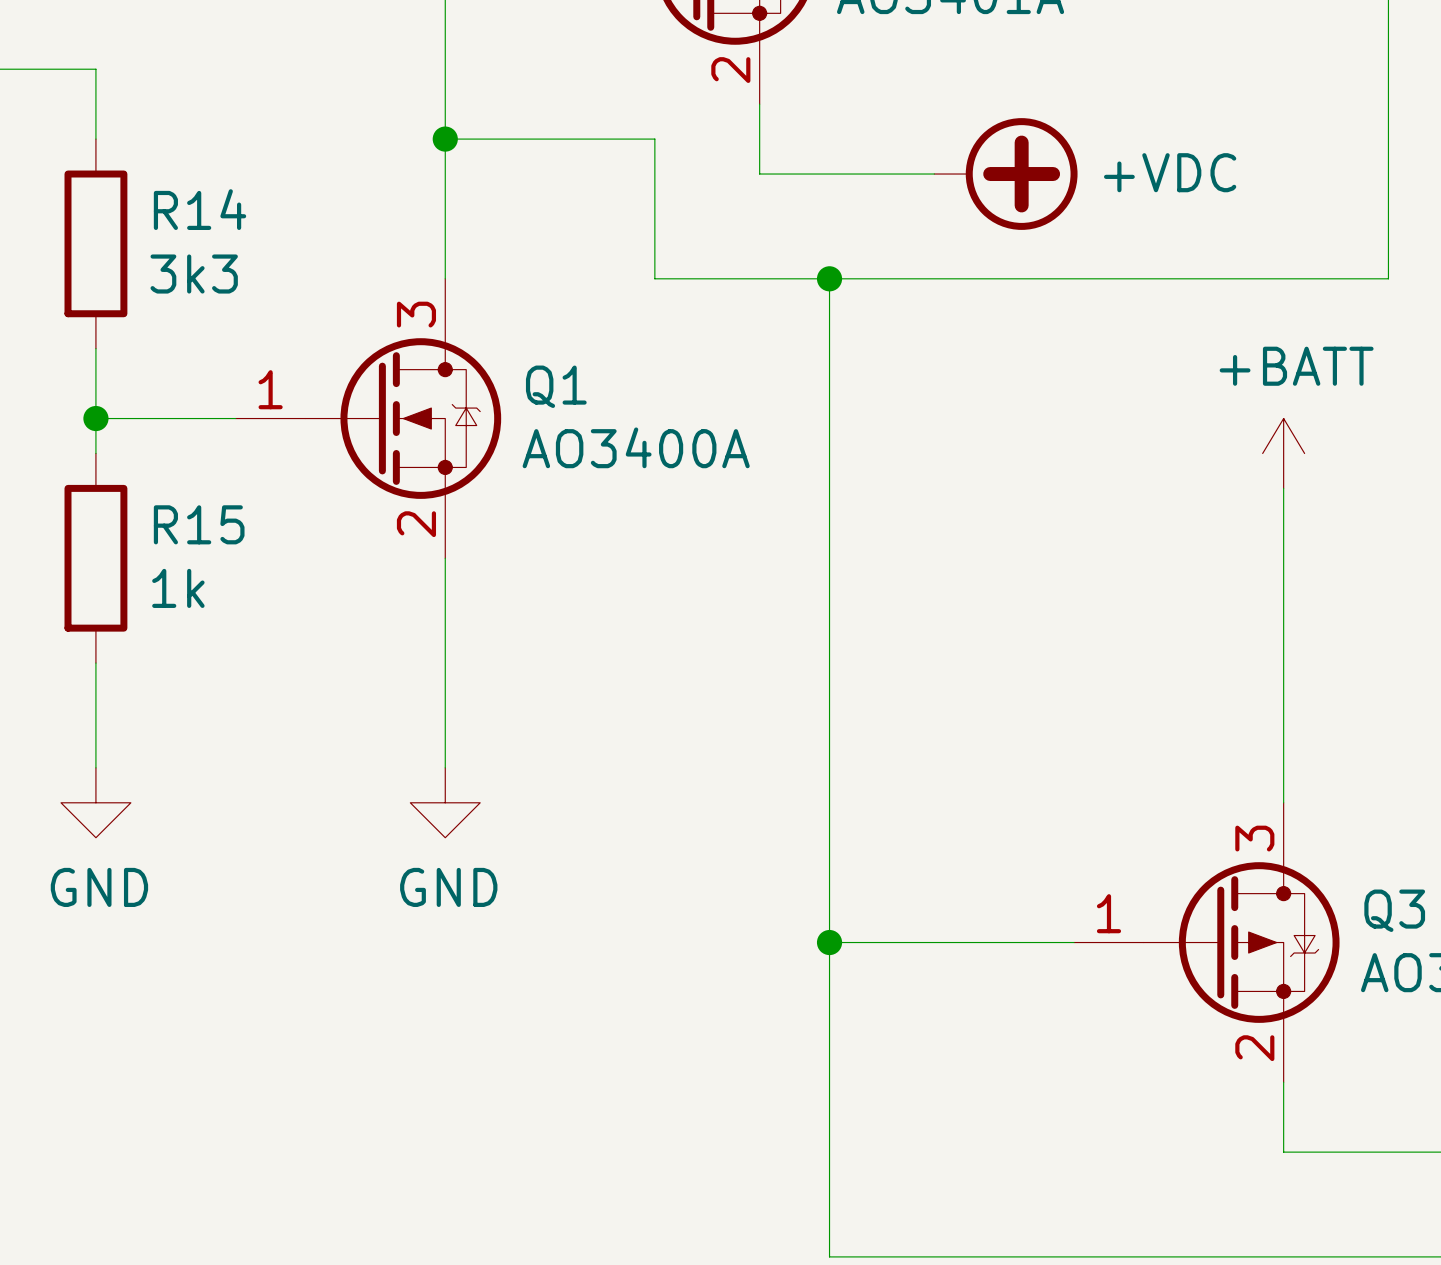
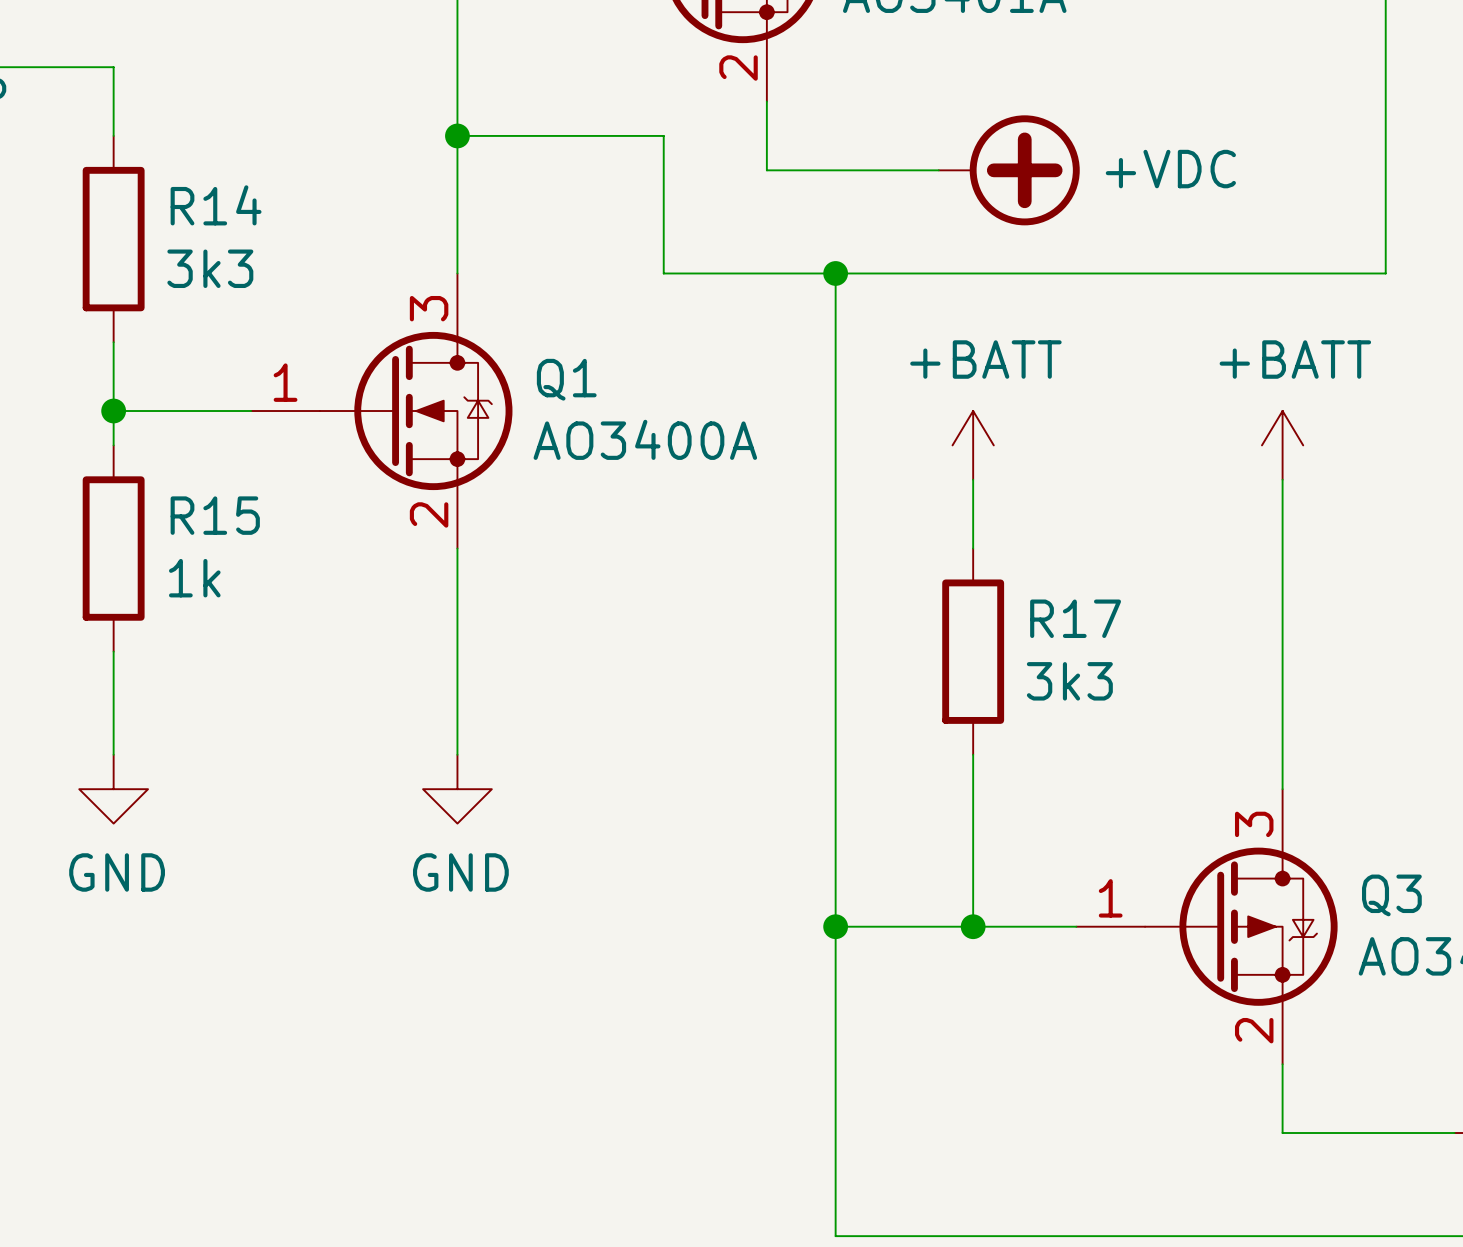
power symbol: none -> +BATT (973, 445)
wire: none -> (973, 479) (973, 548)
R17: none -> 3k3 (973, 651)
wire: none -> (973, 754) (973, 926)
junction: none -> (973, 926)

